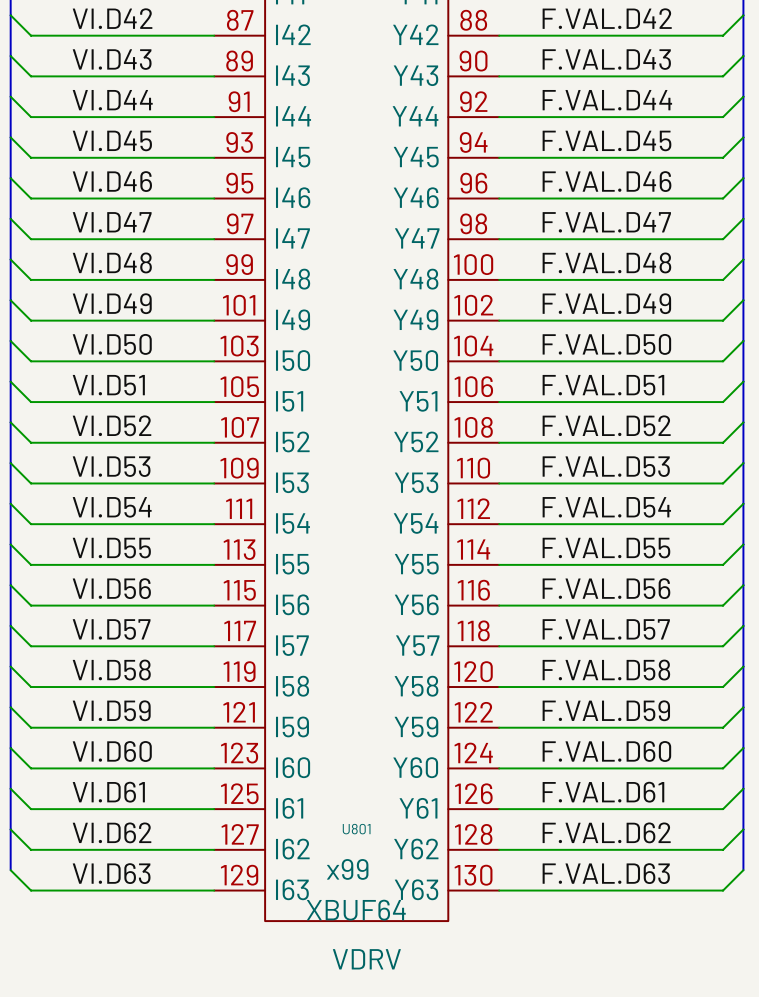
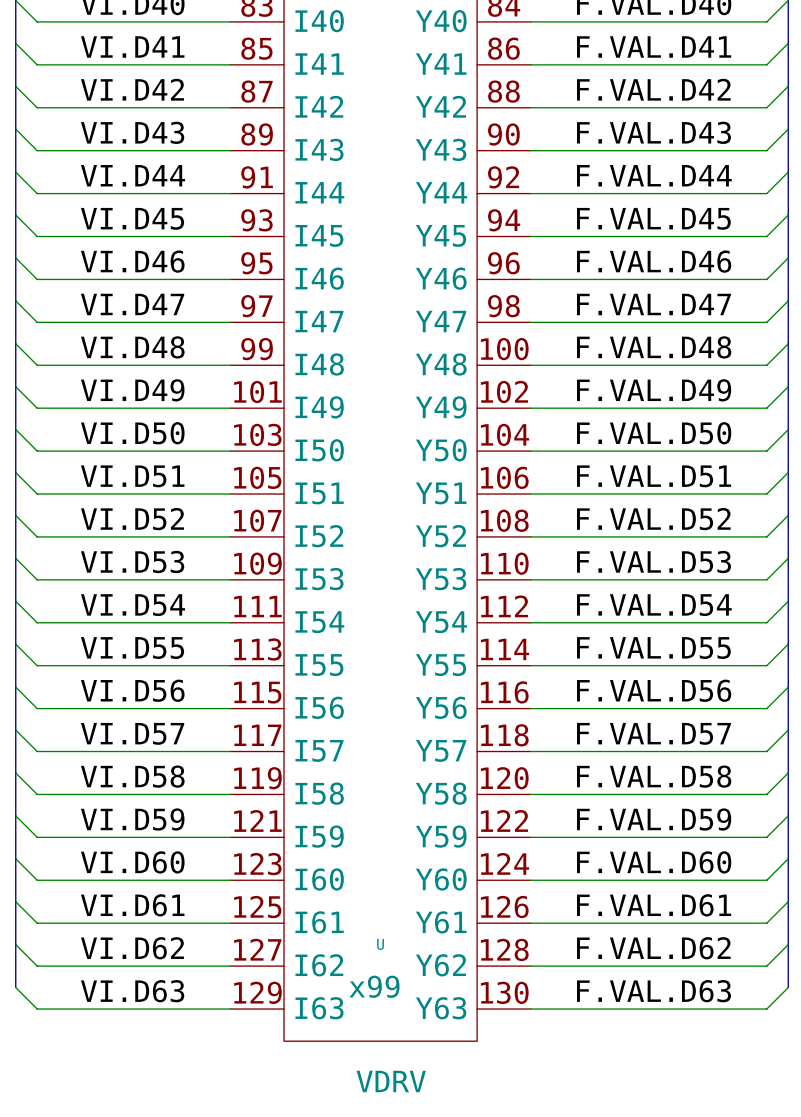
U801 name: U801 (356, 829) -> U (380, 944)
U801 value: XBUF64 (356, 910) -> none

